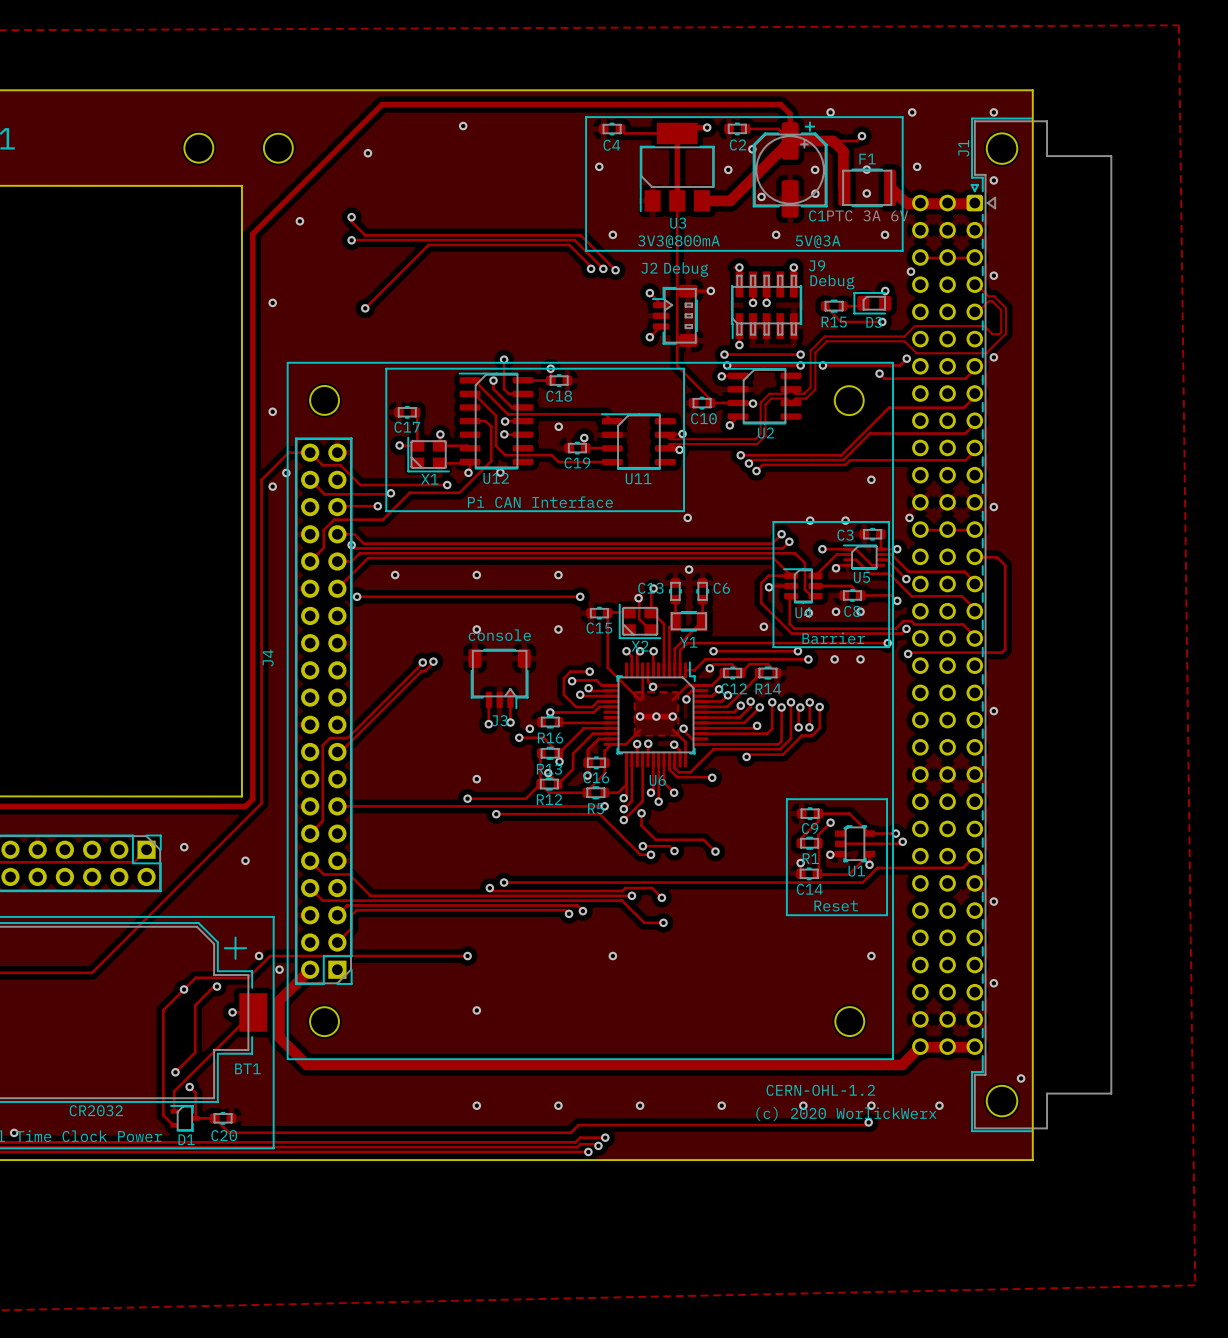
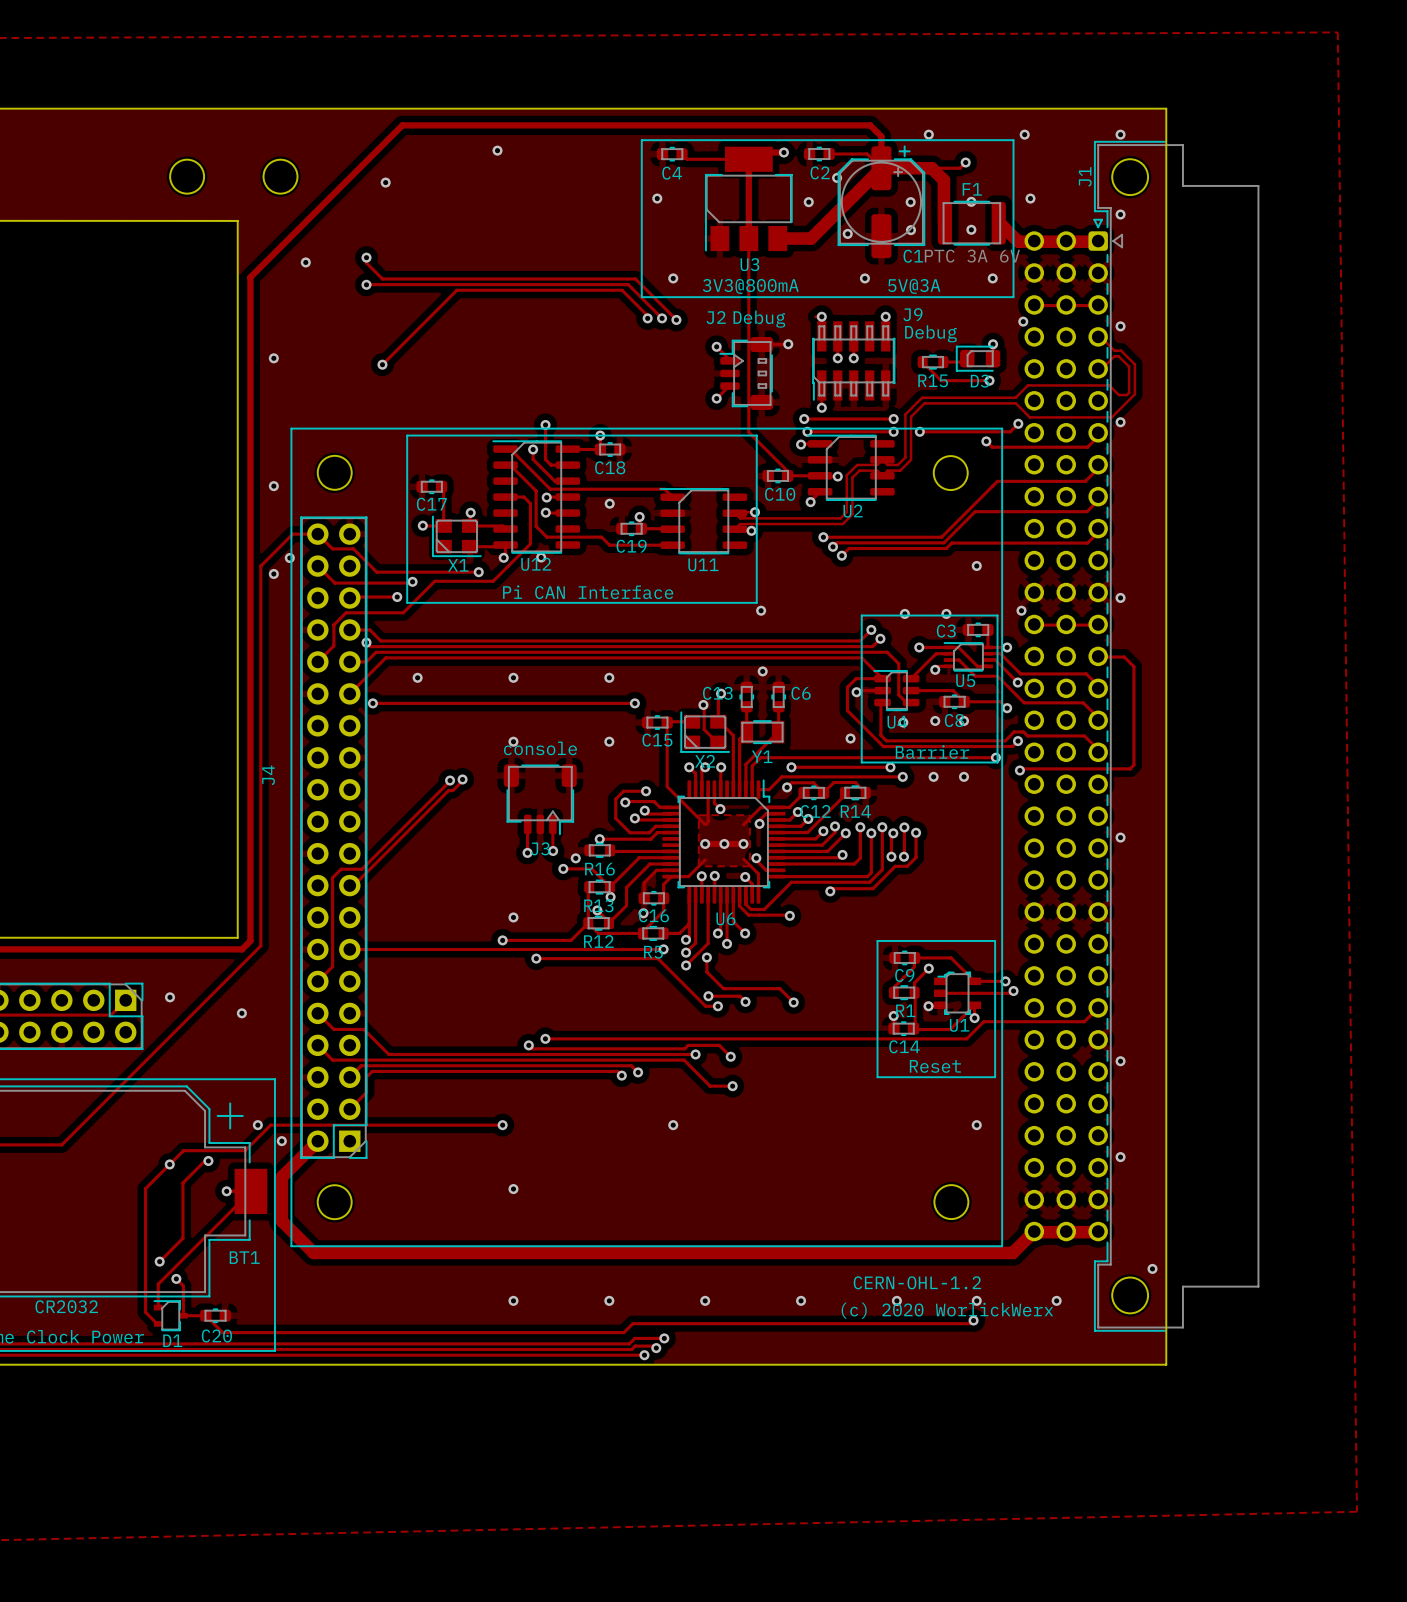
U1 footprint: [834, 825, 876, 862] -> [933, 971, 982, 1015]

